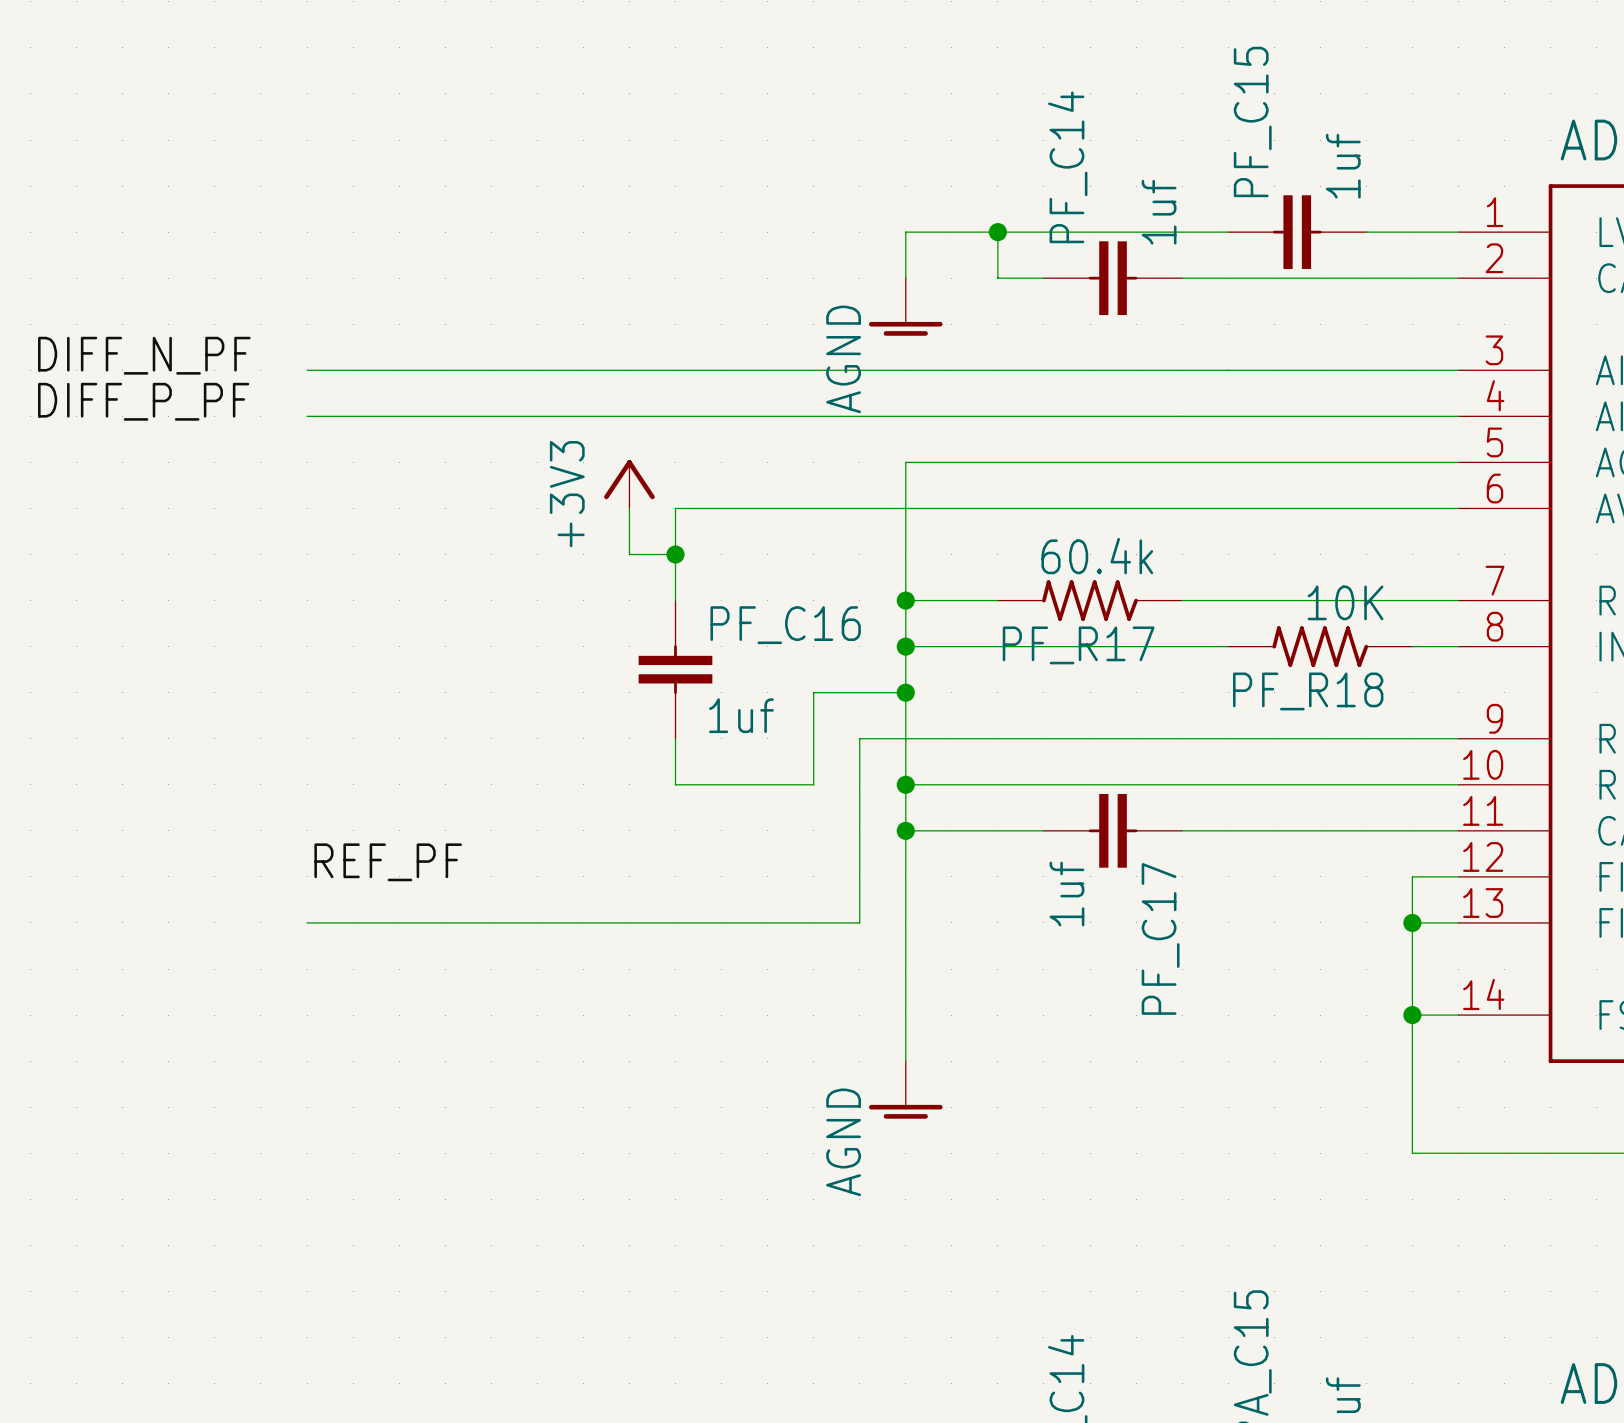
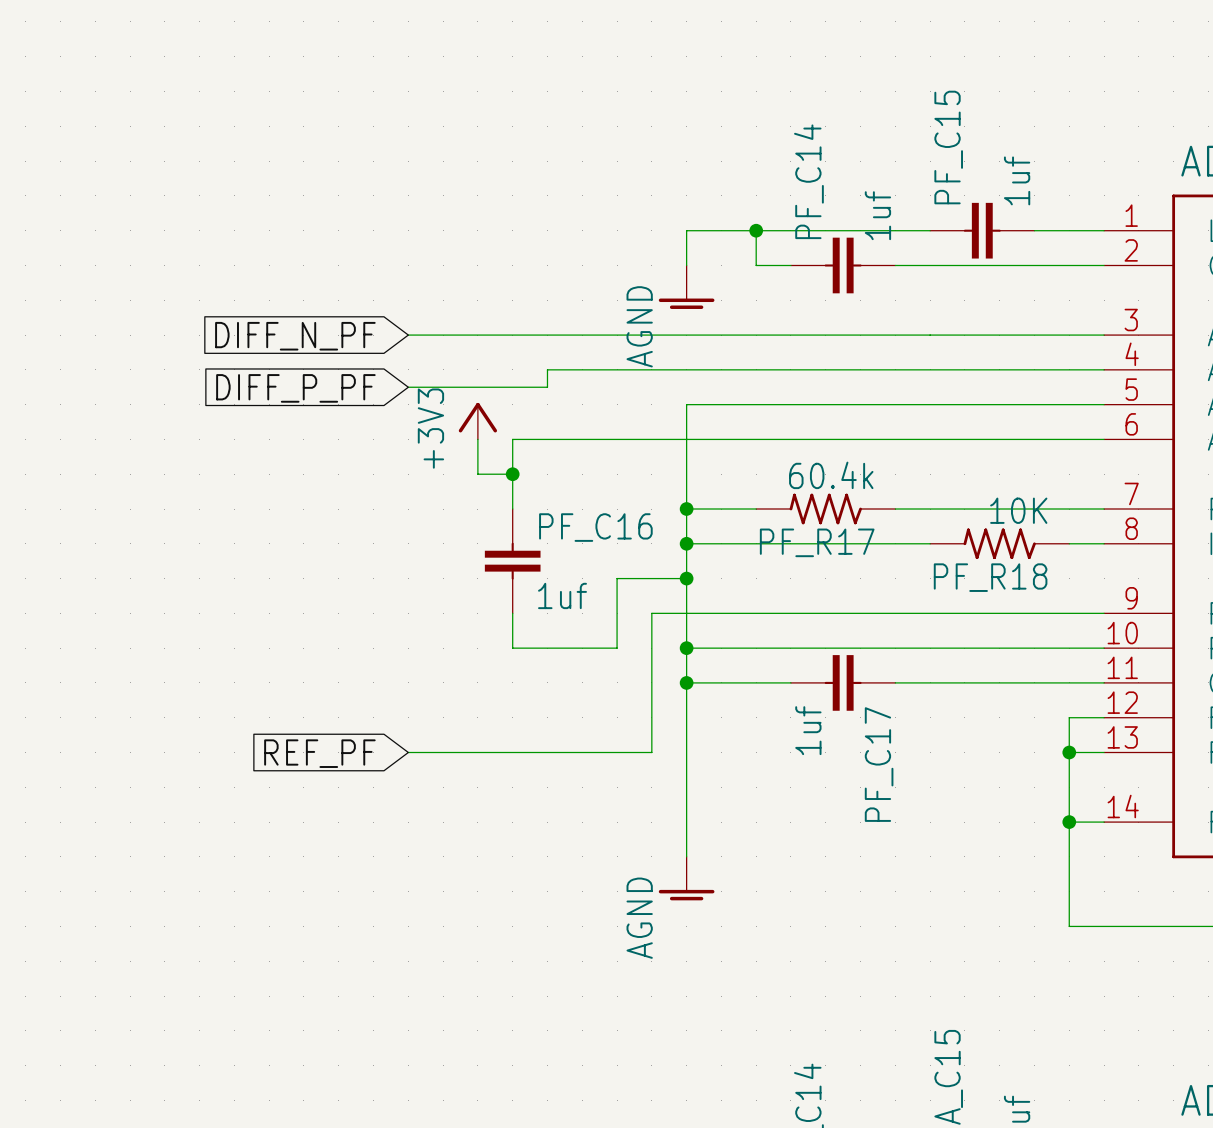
label: DIFF_N_PF (144, 355) -> none
wire: (307, 370) (537, 370) -> none
global label: none -> DIFF_N_PF (295, 336)
label: DIFF_P_PF (143, 401) -> none
wire: (307, 416) (721, 416) -> (408, 387) (547, 387) (547, 369)
global label: none -> DIFF_P_PF (295, 388)
label: REF_PF (388, 862) -> none
wire: (307, 922) (537, 922) -> none
global label: none -> REF_PF (319, 753)

